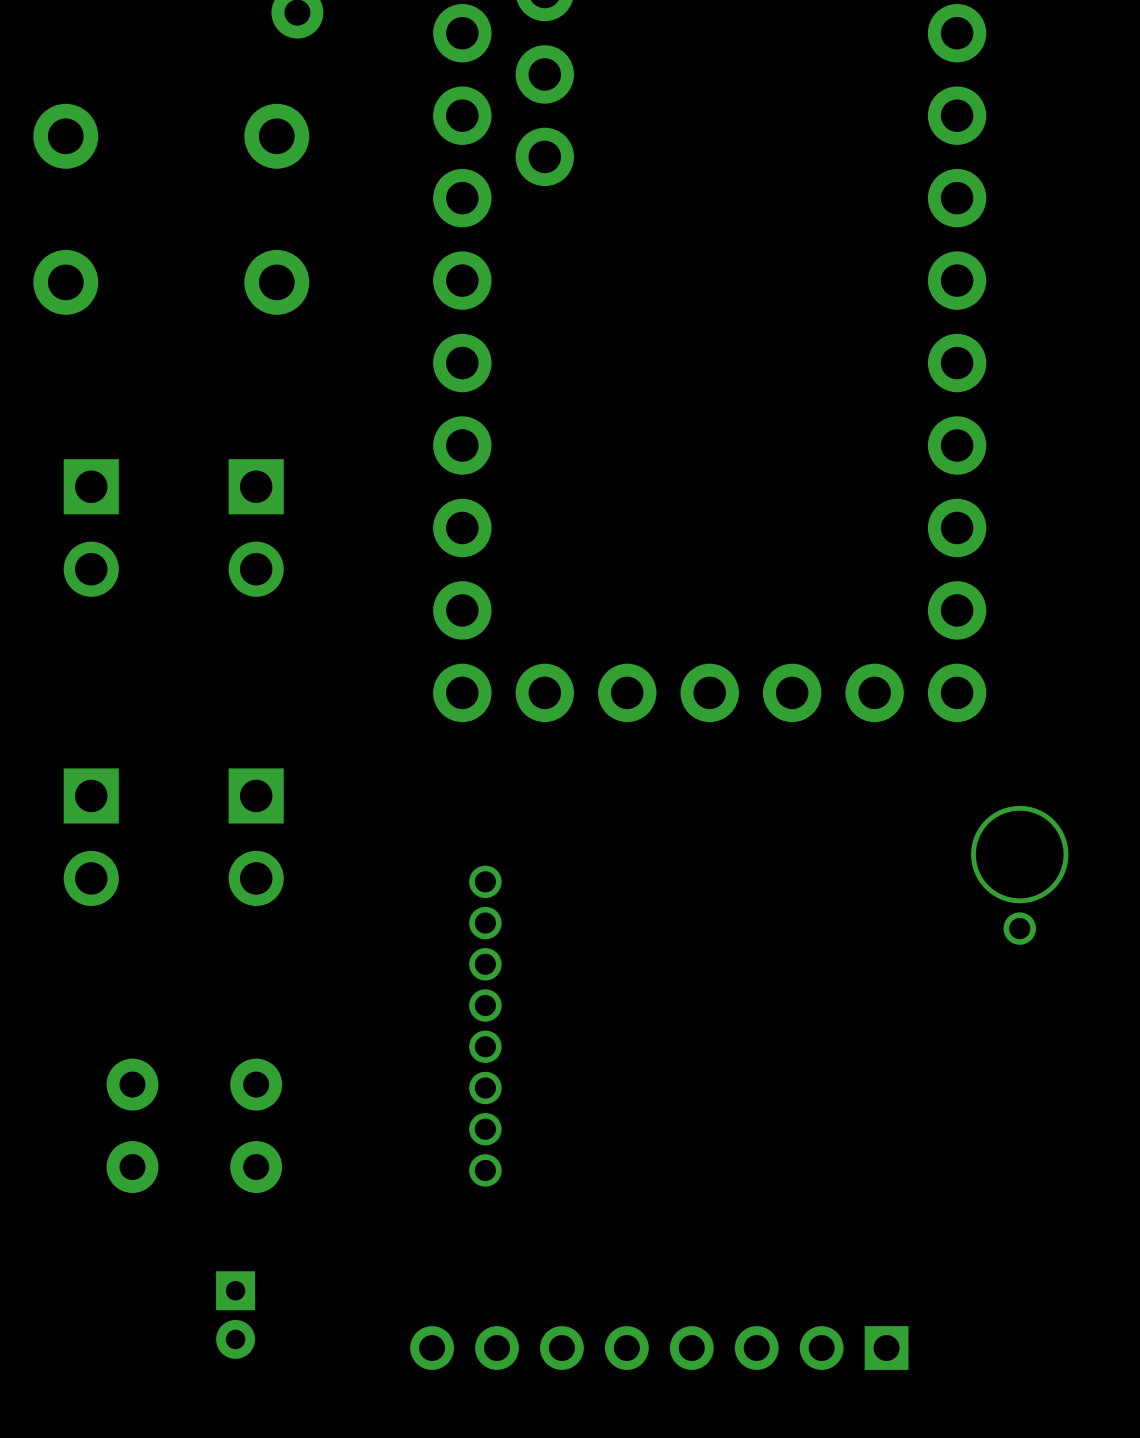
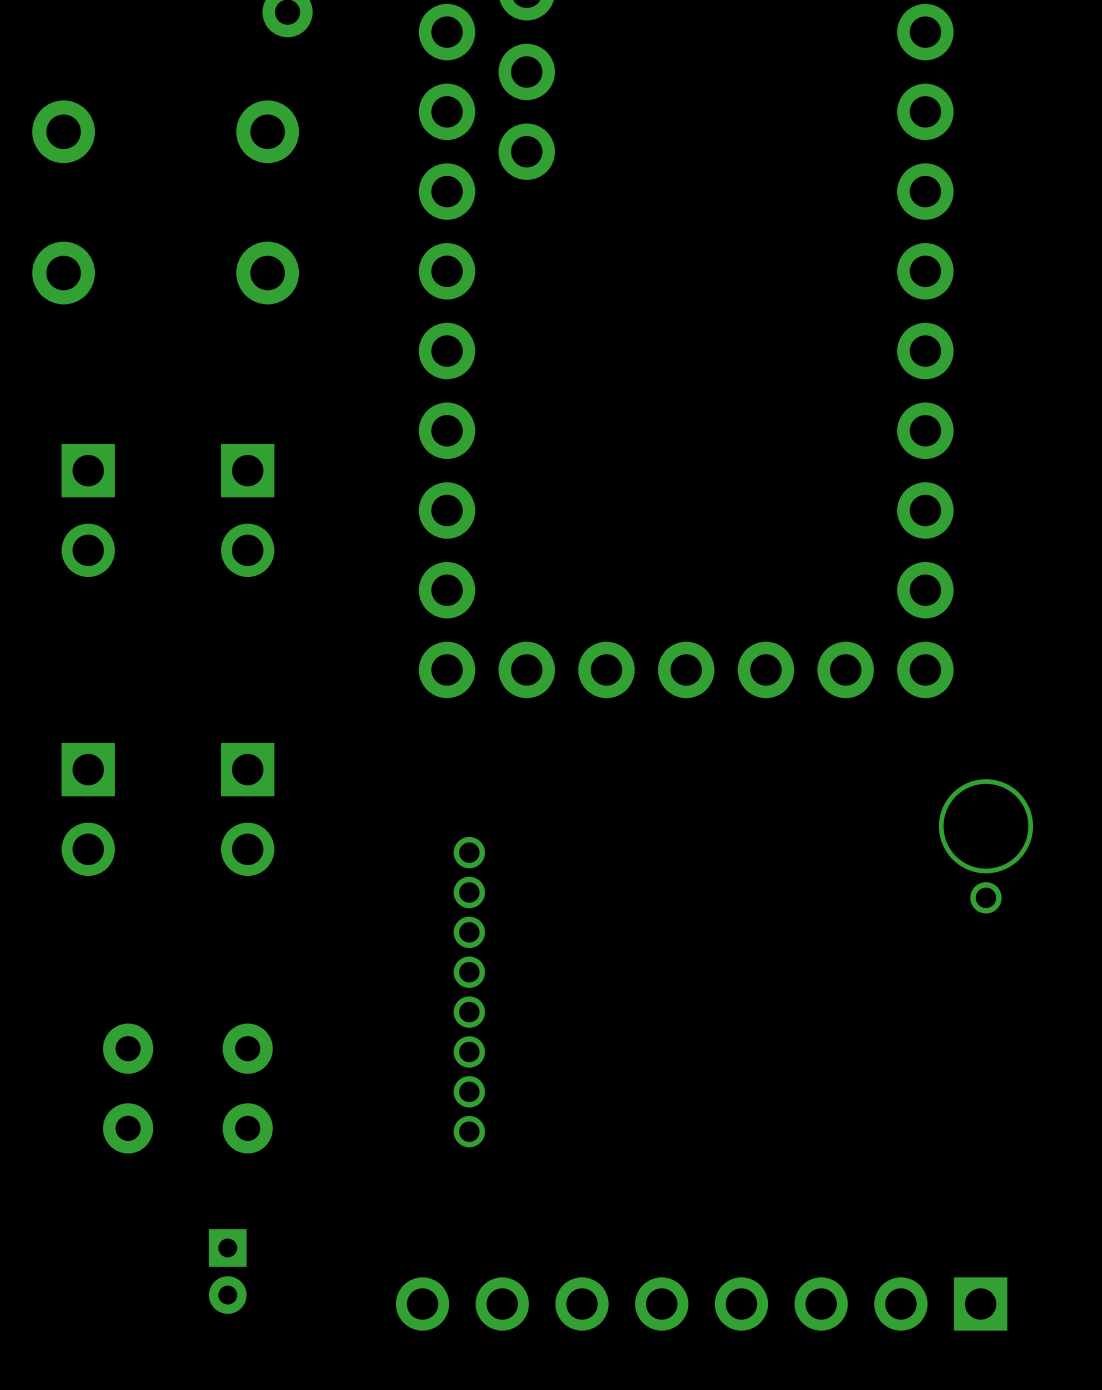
part: (659, 1348) -> none
part: none -> (701, 1304)

